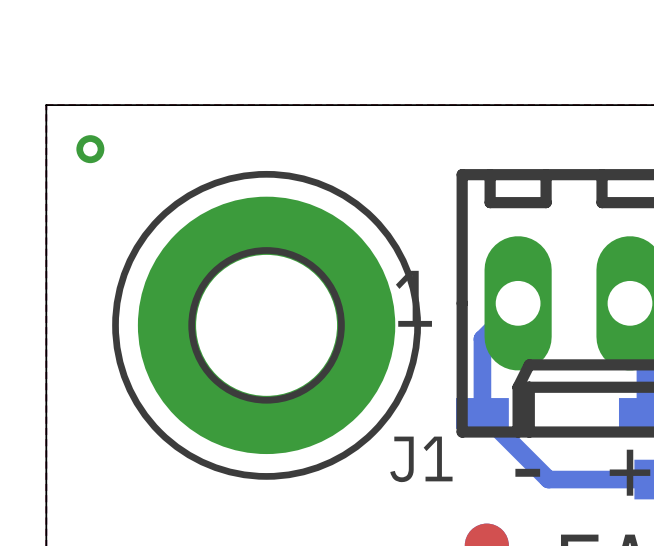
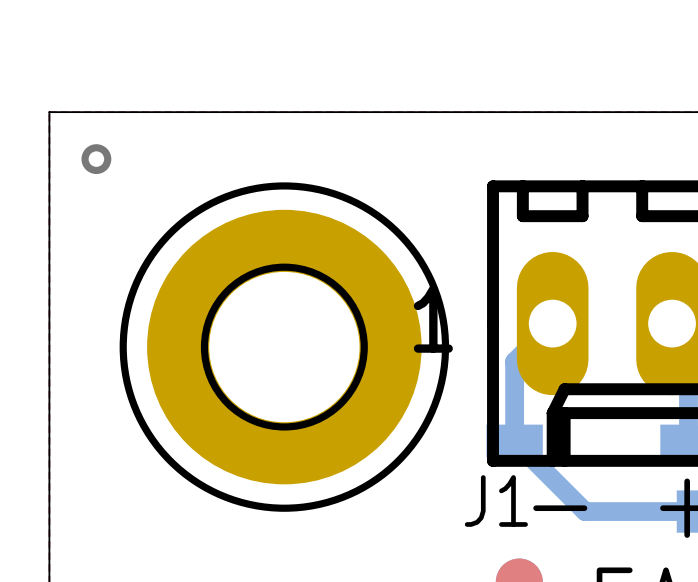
J1 name position: J1 (421, 459) -> J1 (496, 500)

